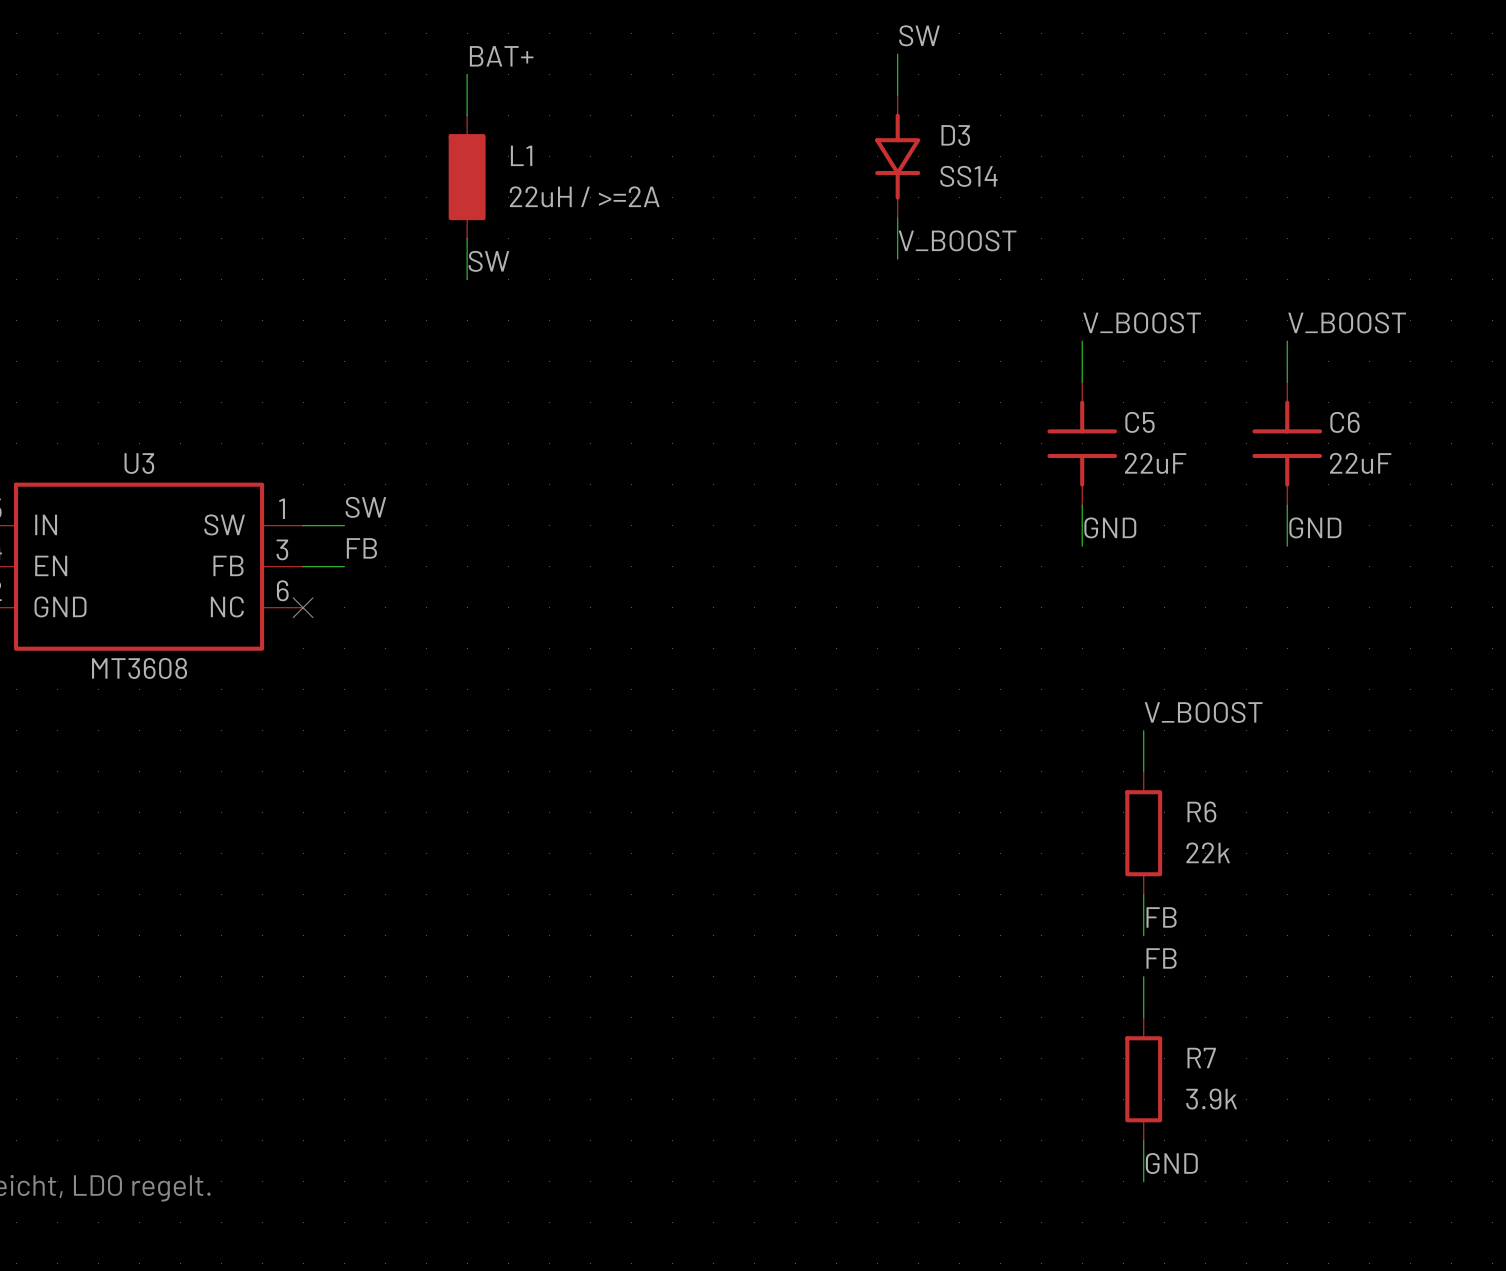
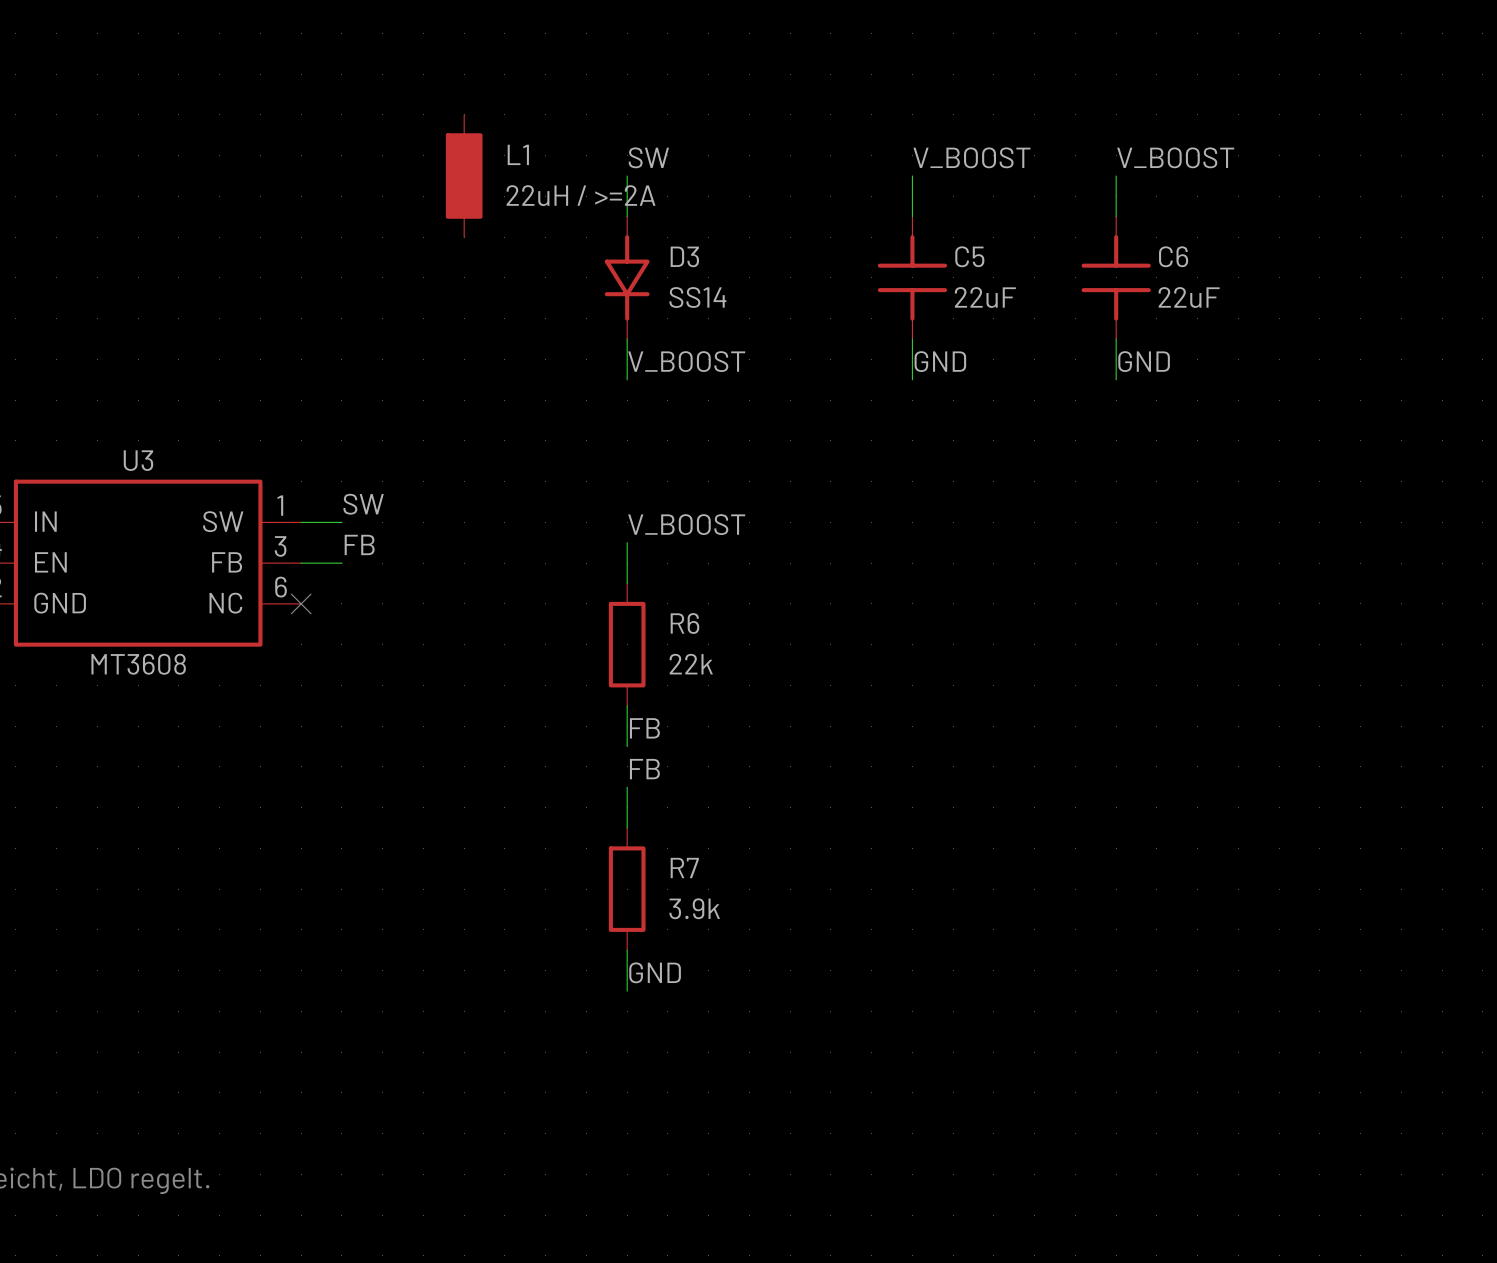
label: SW (919, 35) -> none
wire: (897, 54) (897, 95) -> none
label: BAT+ (501, 56) -> none
wire: (467, 74) (467, 115) -> (627, 176) (627, 216)
D3 position: (897, 156) -> (627, 277)
label: none -> SW (648, 157)
label: none -> V_BOOST (1175, 157)
wire: (897, 218) (897, 259) -> none
wire: (467, 238) (467, 279) -> (627, 339) (627, 379)
label position: V_BOOST (957, 240) -> V_BOOST (971, 157)
label: SW (488, 261) -> none
label: V_BOOST (1142, 322) -> none
label: V_BOOST (1347, 322) -> none
wire: (1082, 341) (1082, 382) -> (912, 176) (912, 216)
wire: (1287, 341) (1287, 382) -> (1116, 176) (1116, 216)
label: none -> V_BOOST (686, 361)
label: none -> GND (940, 361)
label: none -> GND (1144, 361)
C5 position: (1082, 443) -> (912, 277)
C6 position: (1287, 443) -> (1116, 277)
wire: (1082, 505) (1082, 546) -> (912, 339) (912, 379)
wire: (1287, 505) (1287, 546) -> (1116, 339) (1116, 379)
label: none -> V_BOOST (686, 524)
label: GND (1110, 527) -> none
label: GND (1315, 527) -> none
wire: none -> (627, 542) (627, 583)
wire: none -> (627, 705) (627, 746)
label: V_BOOST (1203, 712) -> none
wire: (1143, 730) (1143, 771) -> none
label: none -> FB (644, 728)
label: none -> FB (644, 769)
wire: none -> (627, 787) (627, 828)
R6 position: (1143, 833) -> (627, 644)
wire: (1143, 894) (1143, 935) -> none
label: FB (1161, 917) -> none
wire: none -> (627, 950) (627, 991)
label: FB (1161, 958) -> none
wire: (1143, 976) (1143, 1017) -> none
label: none -> GND (655, 972)
R7 position: (1143, 1079) -> (627, 889)
wire: (1143, 1140) (1143, 1181) -> none
label: GND (1171, 1163) -> none

